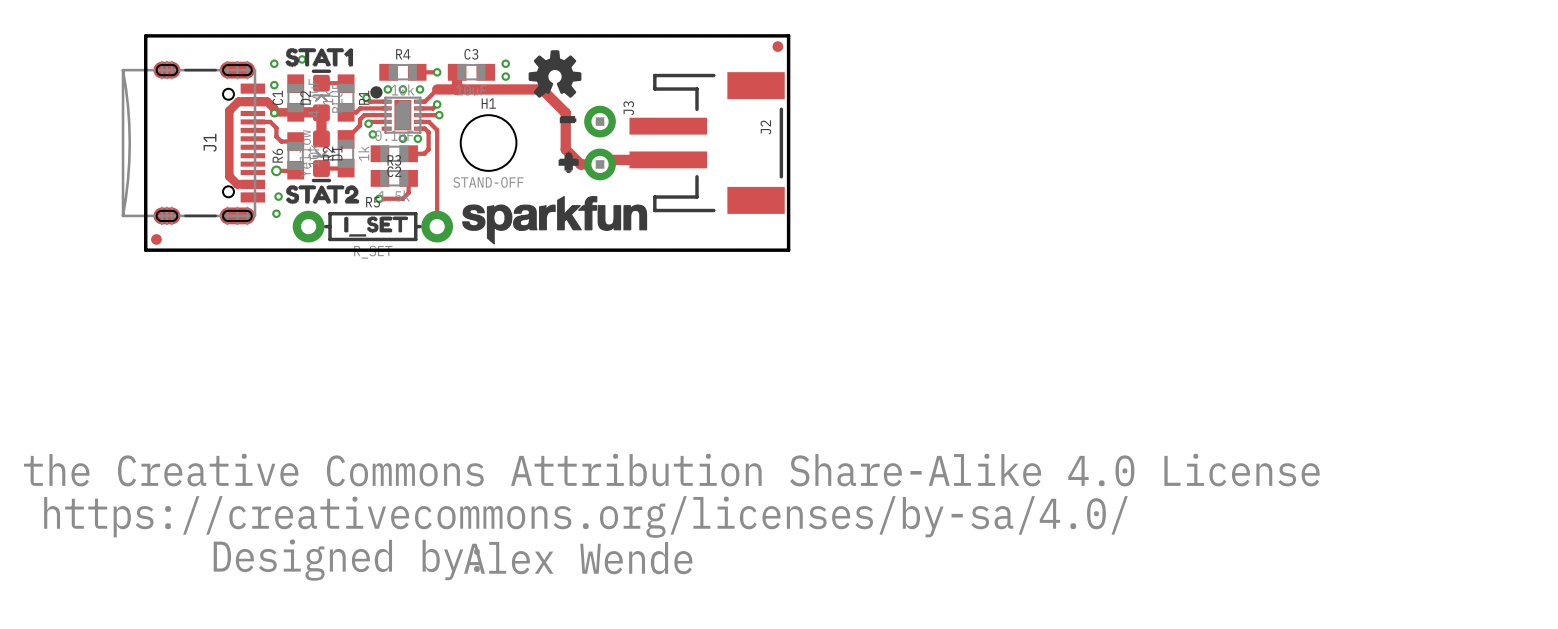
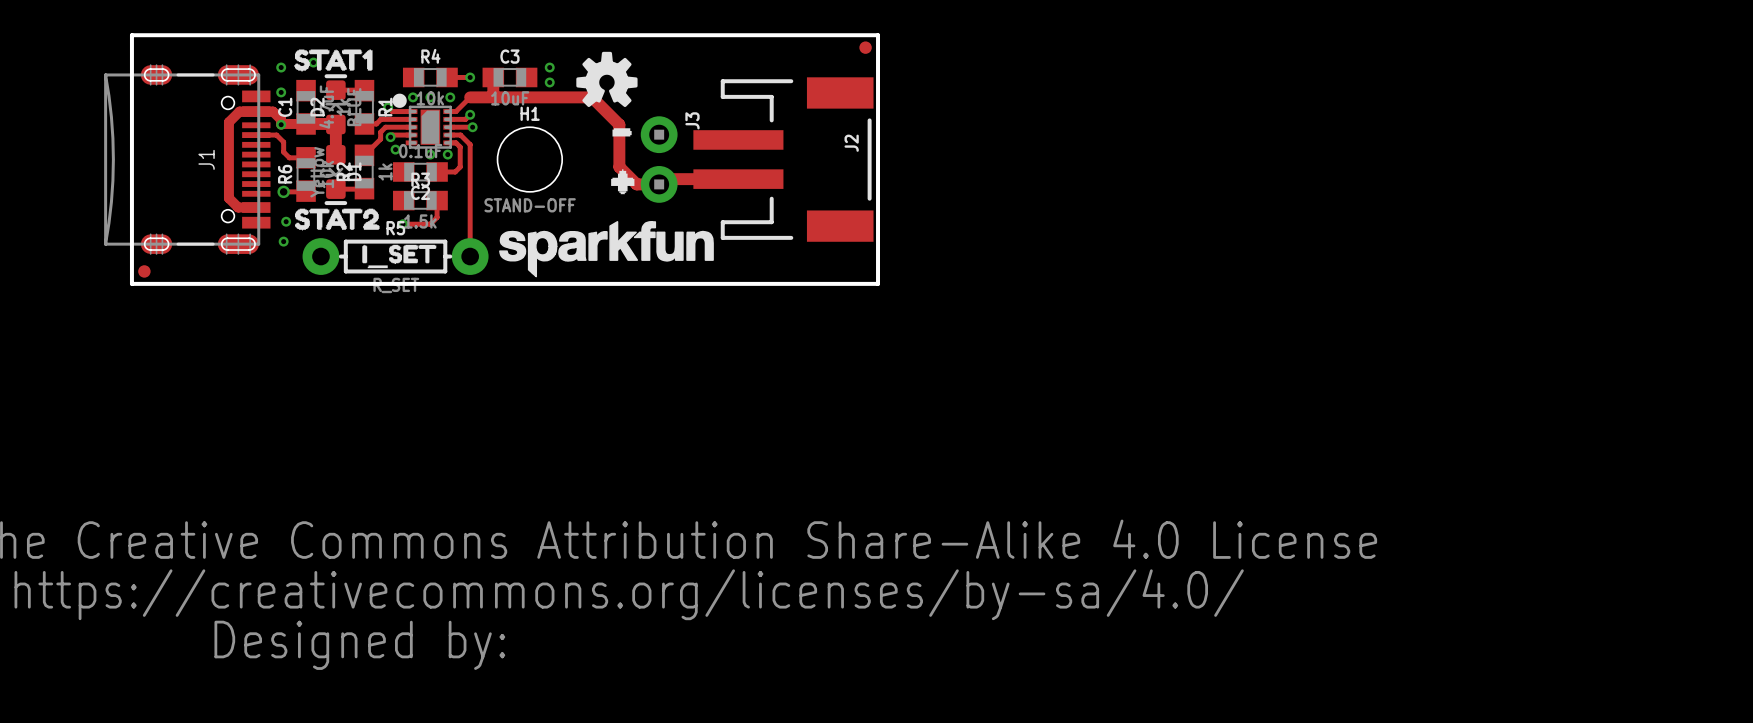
text: Alex Wende (578, 558) -> none

